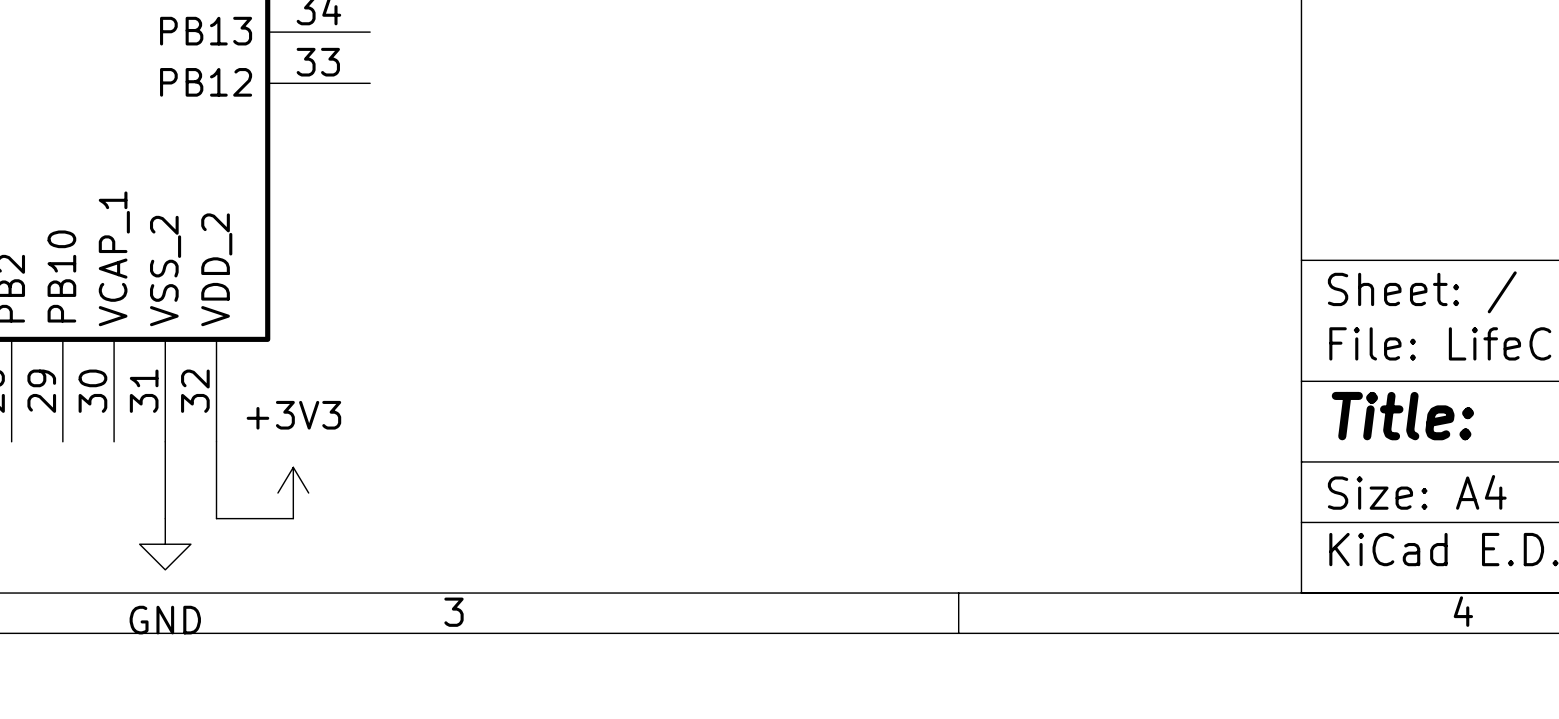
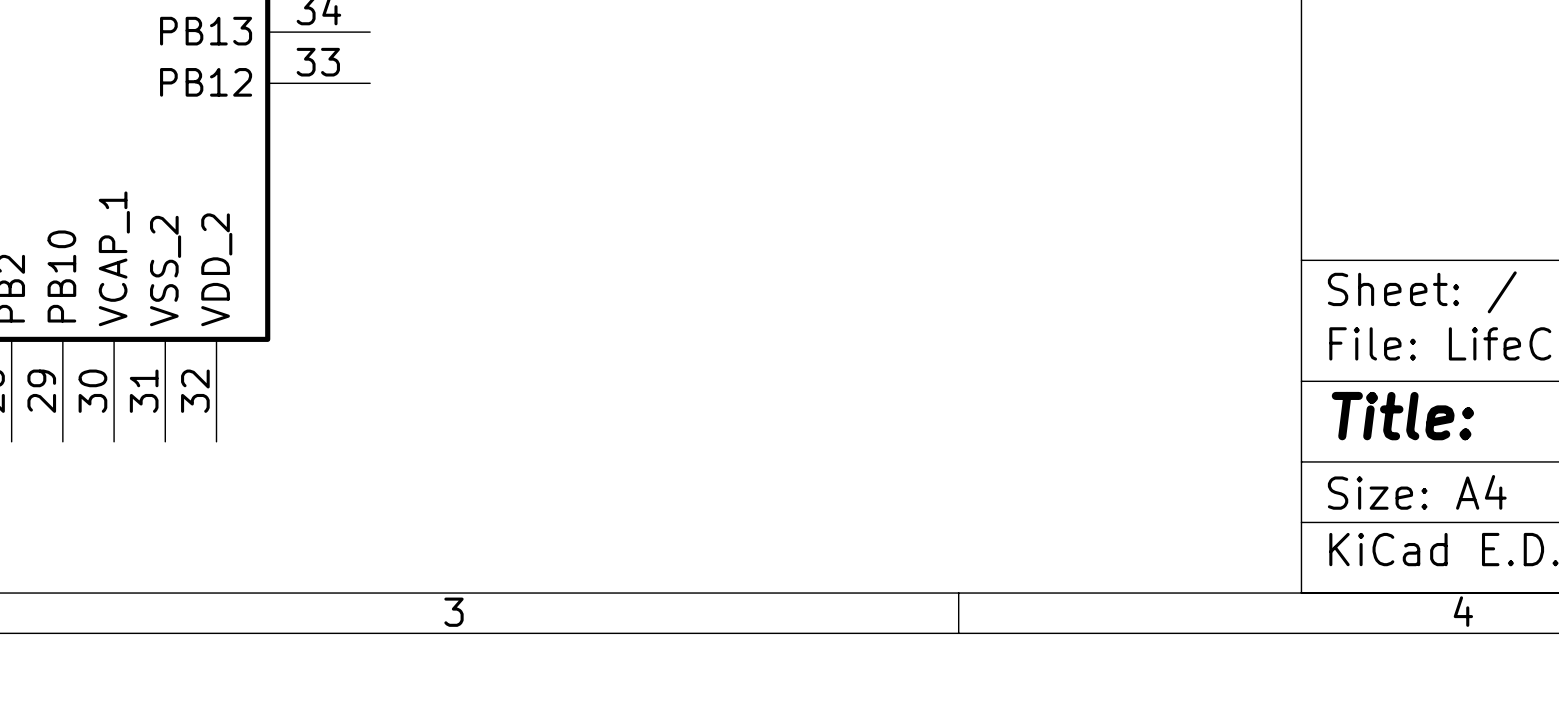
wire: (165, 441) (165, 518) -> none
wire: (216, 441) (216, 518) (293, 518) -> none
power symbol: +3V3 (293, 493) -> none
power symbol: GND (165, 544) -> none

